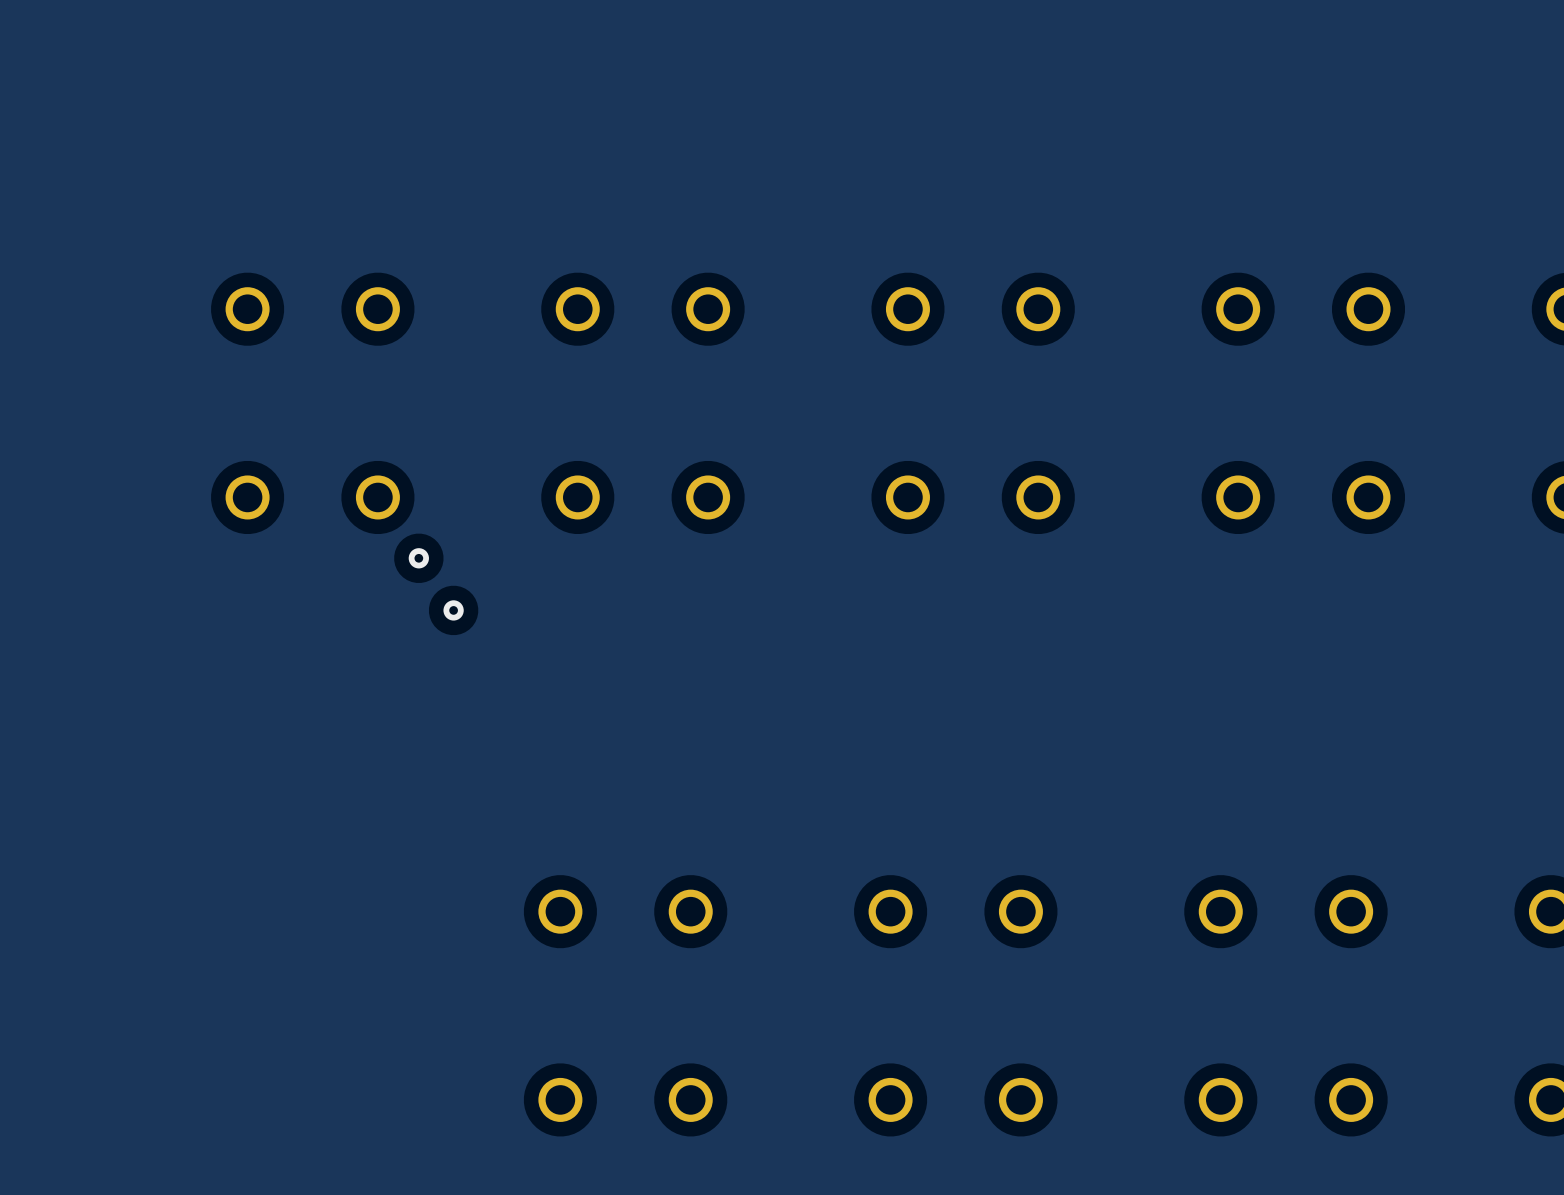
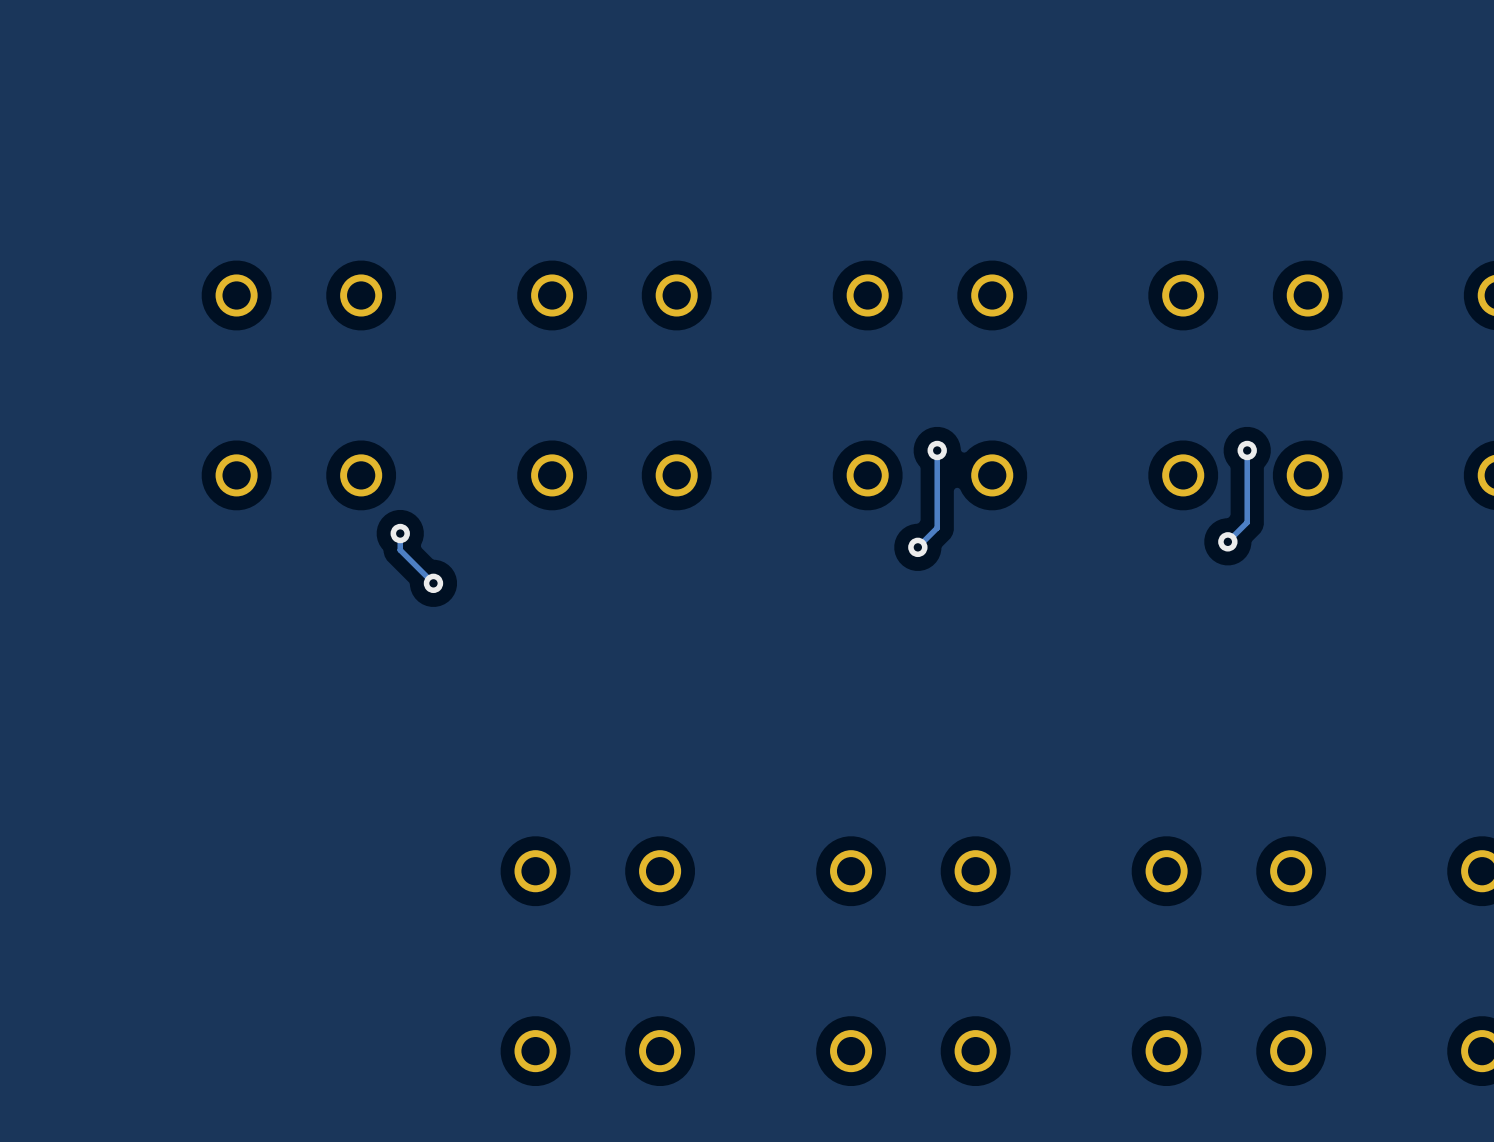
track: none -> (937, 450) (937, 527) (917, 547)
via: none -> (937, 450)
track: none -> (1247, 450) (1247, 522) (1227, 541)
via: none -> (1247, 450)
track: none -> (400, 533) (400, 550) (433, 583)
via: none -> (1227, 541)
via: none -> (917, 547)

